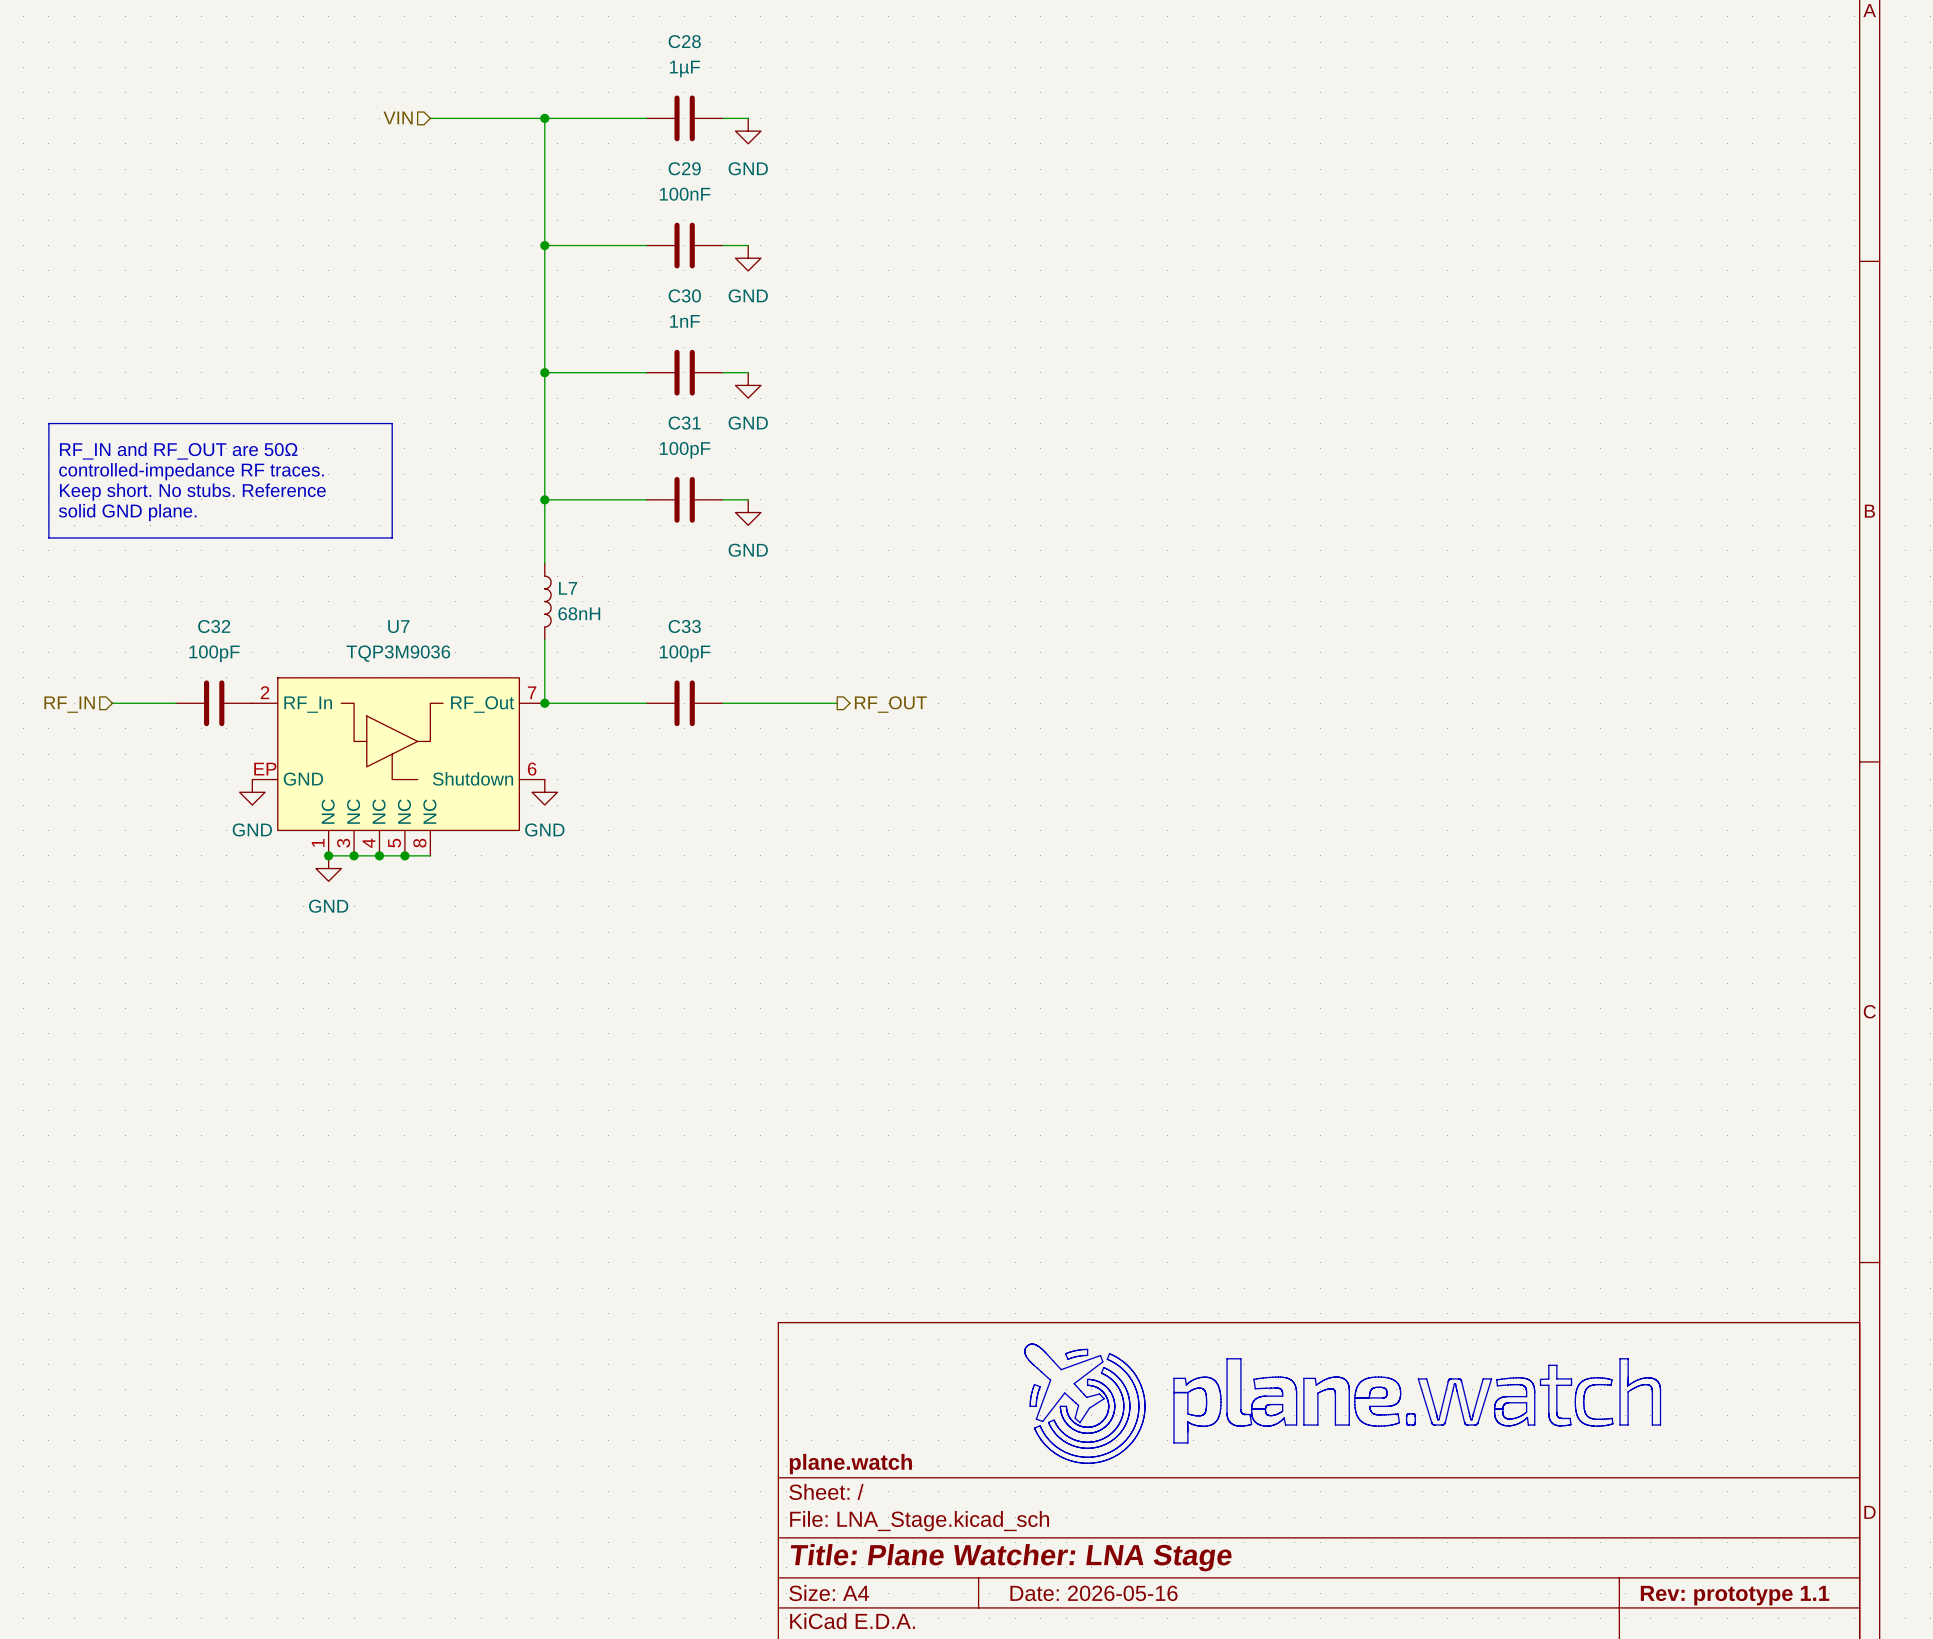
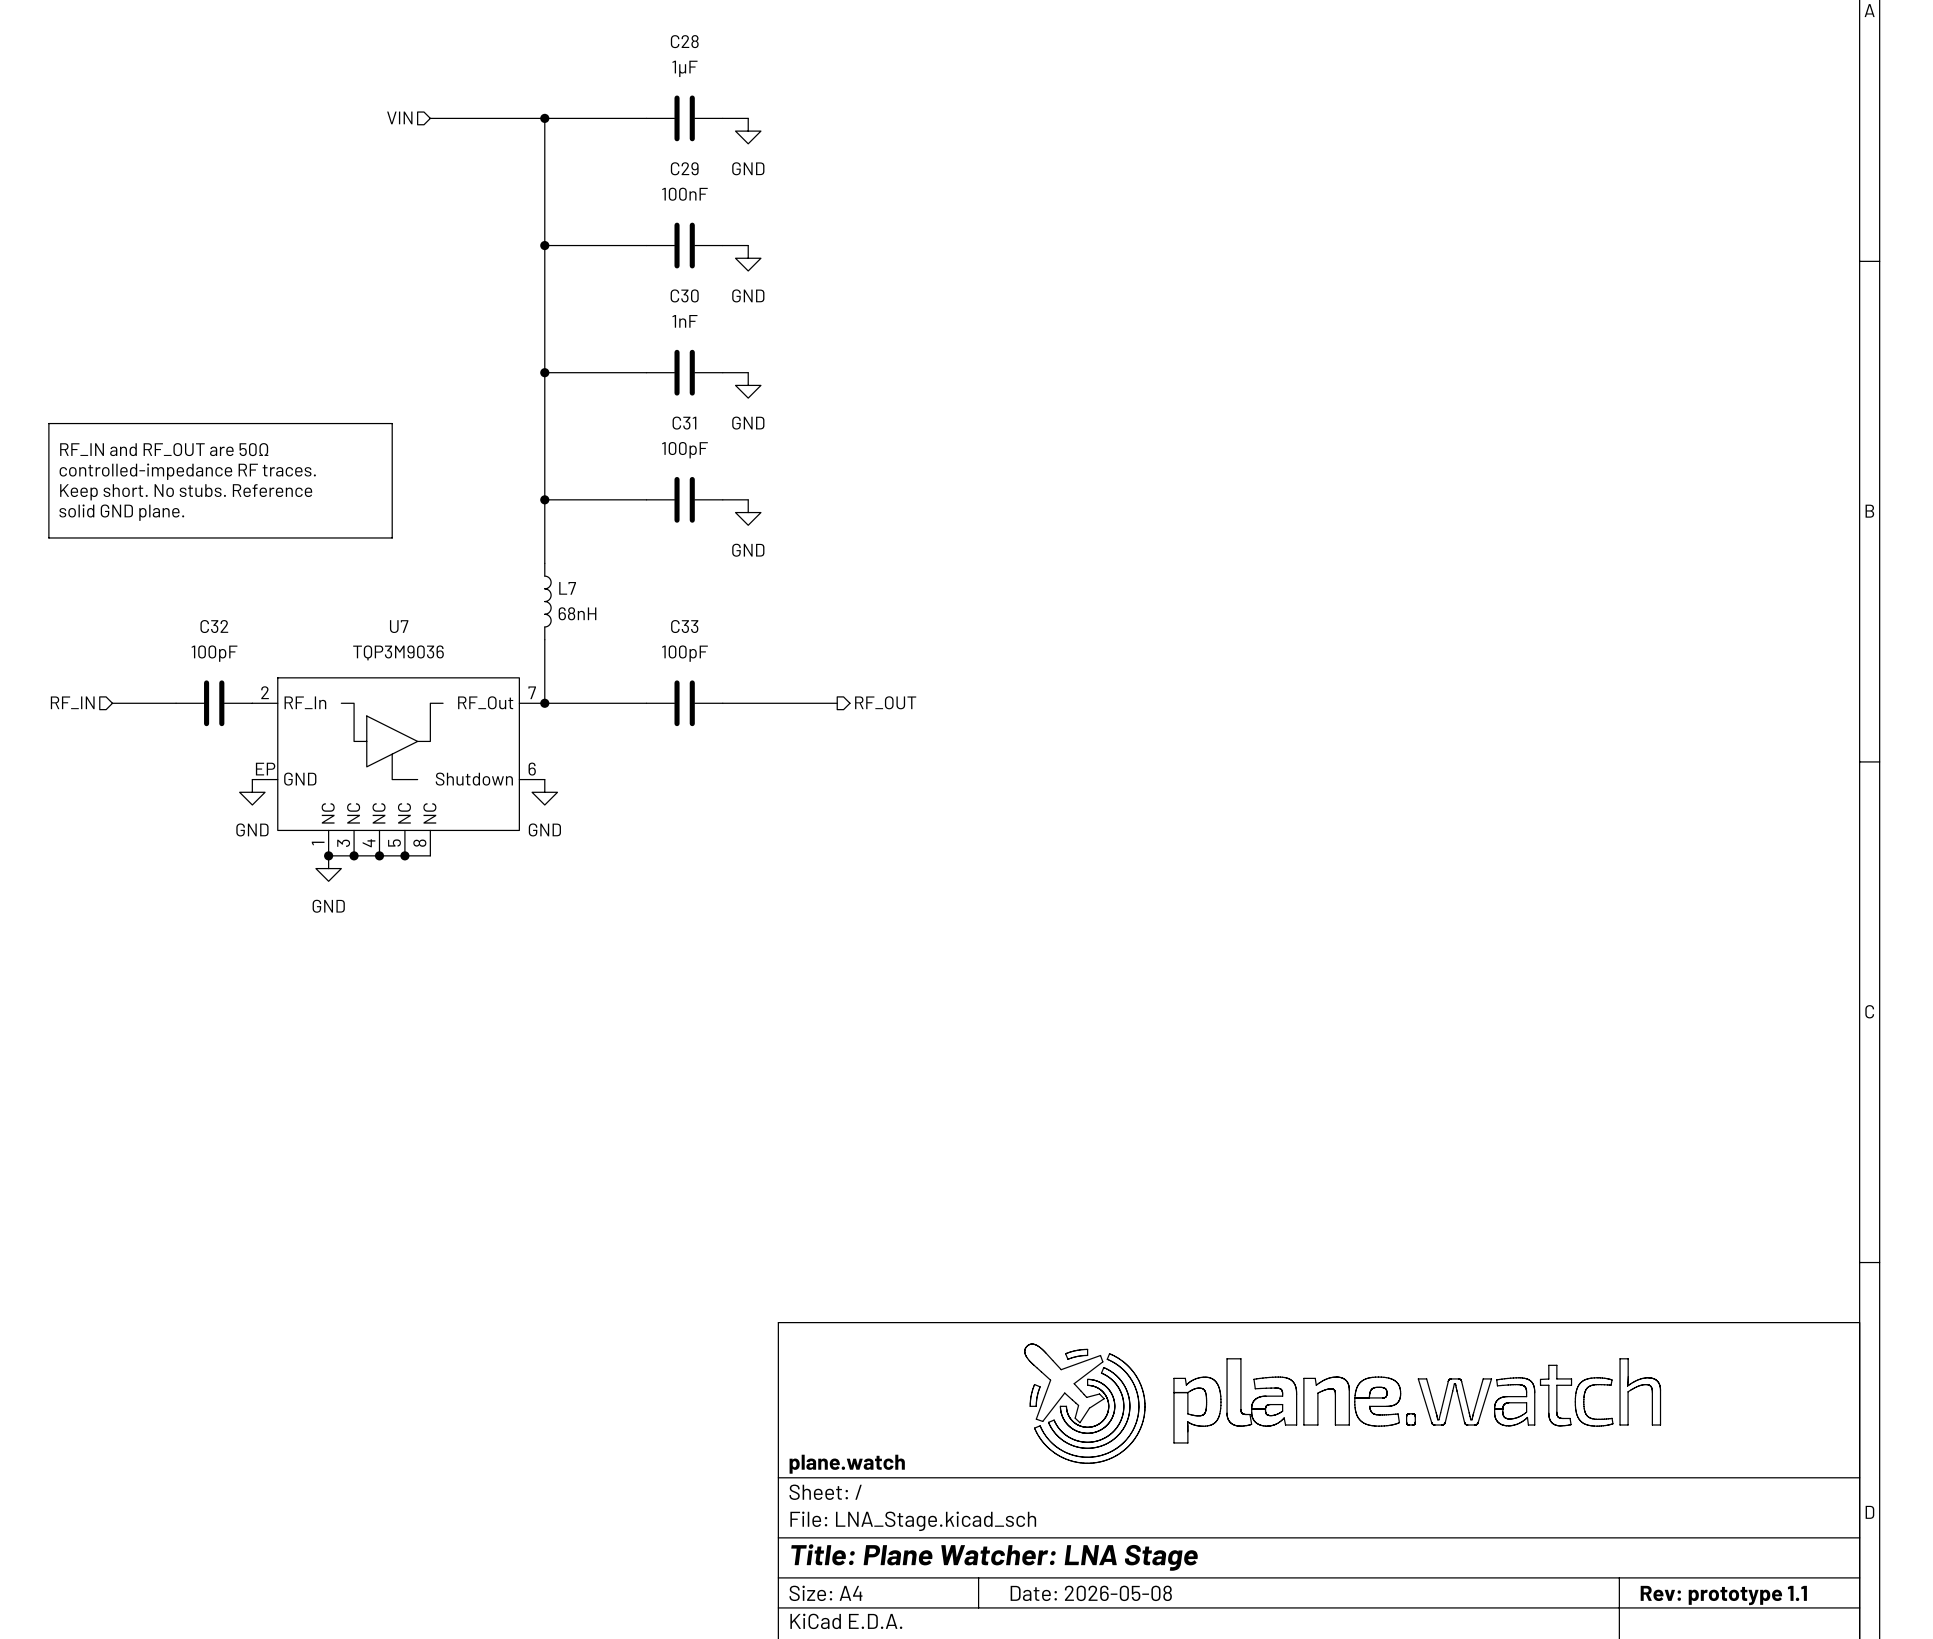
title block: Date: 2026-05-16 (1094, 1593) -> Date: 2026-05-08 (1091, 1593)

